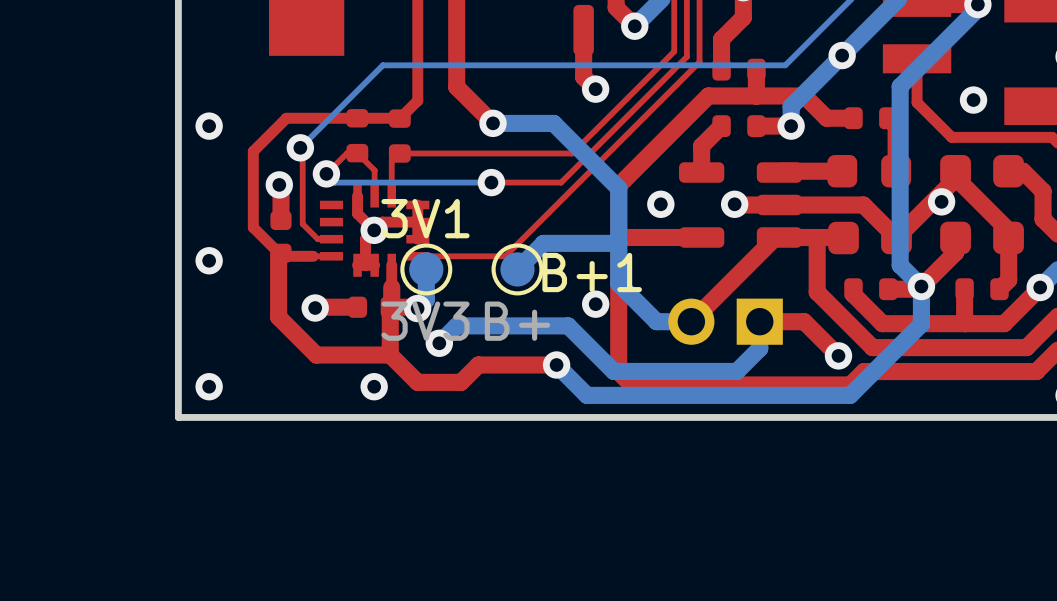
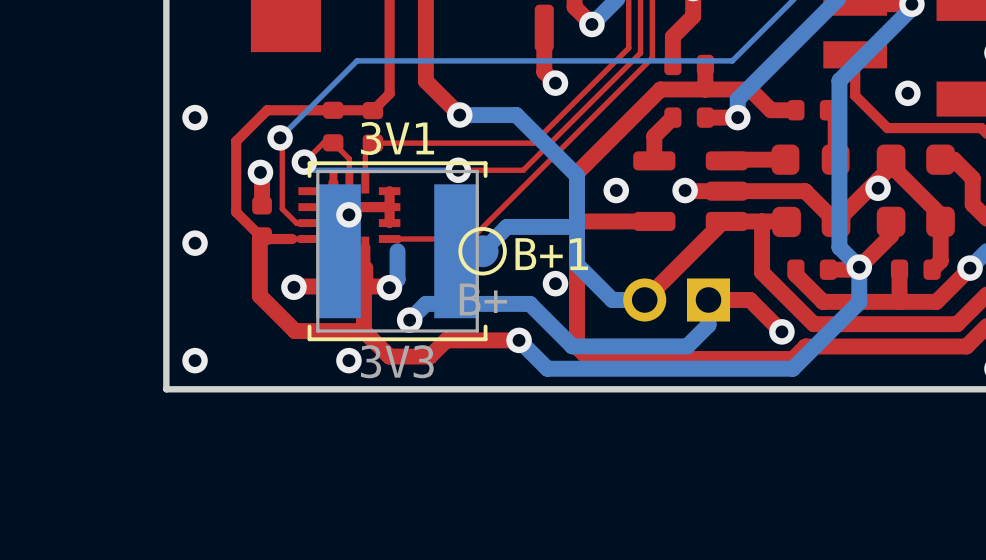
via: (842, 55) -> none
3V1 name position: 3V1 (425, 218) -> 3V1 (397, 138)
3V1 footprint: [400, 243, 453, 296] -> [307, 161, 488, 342]

